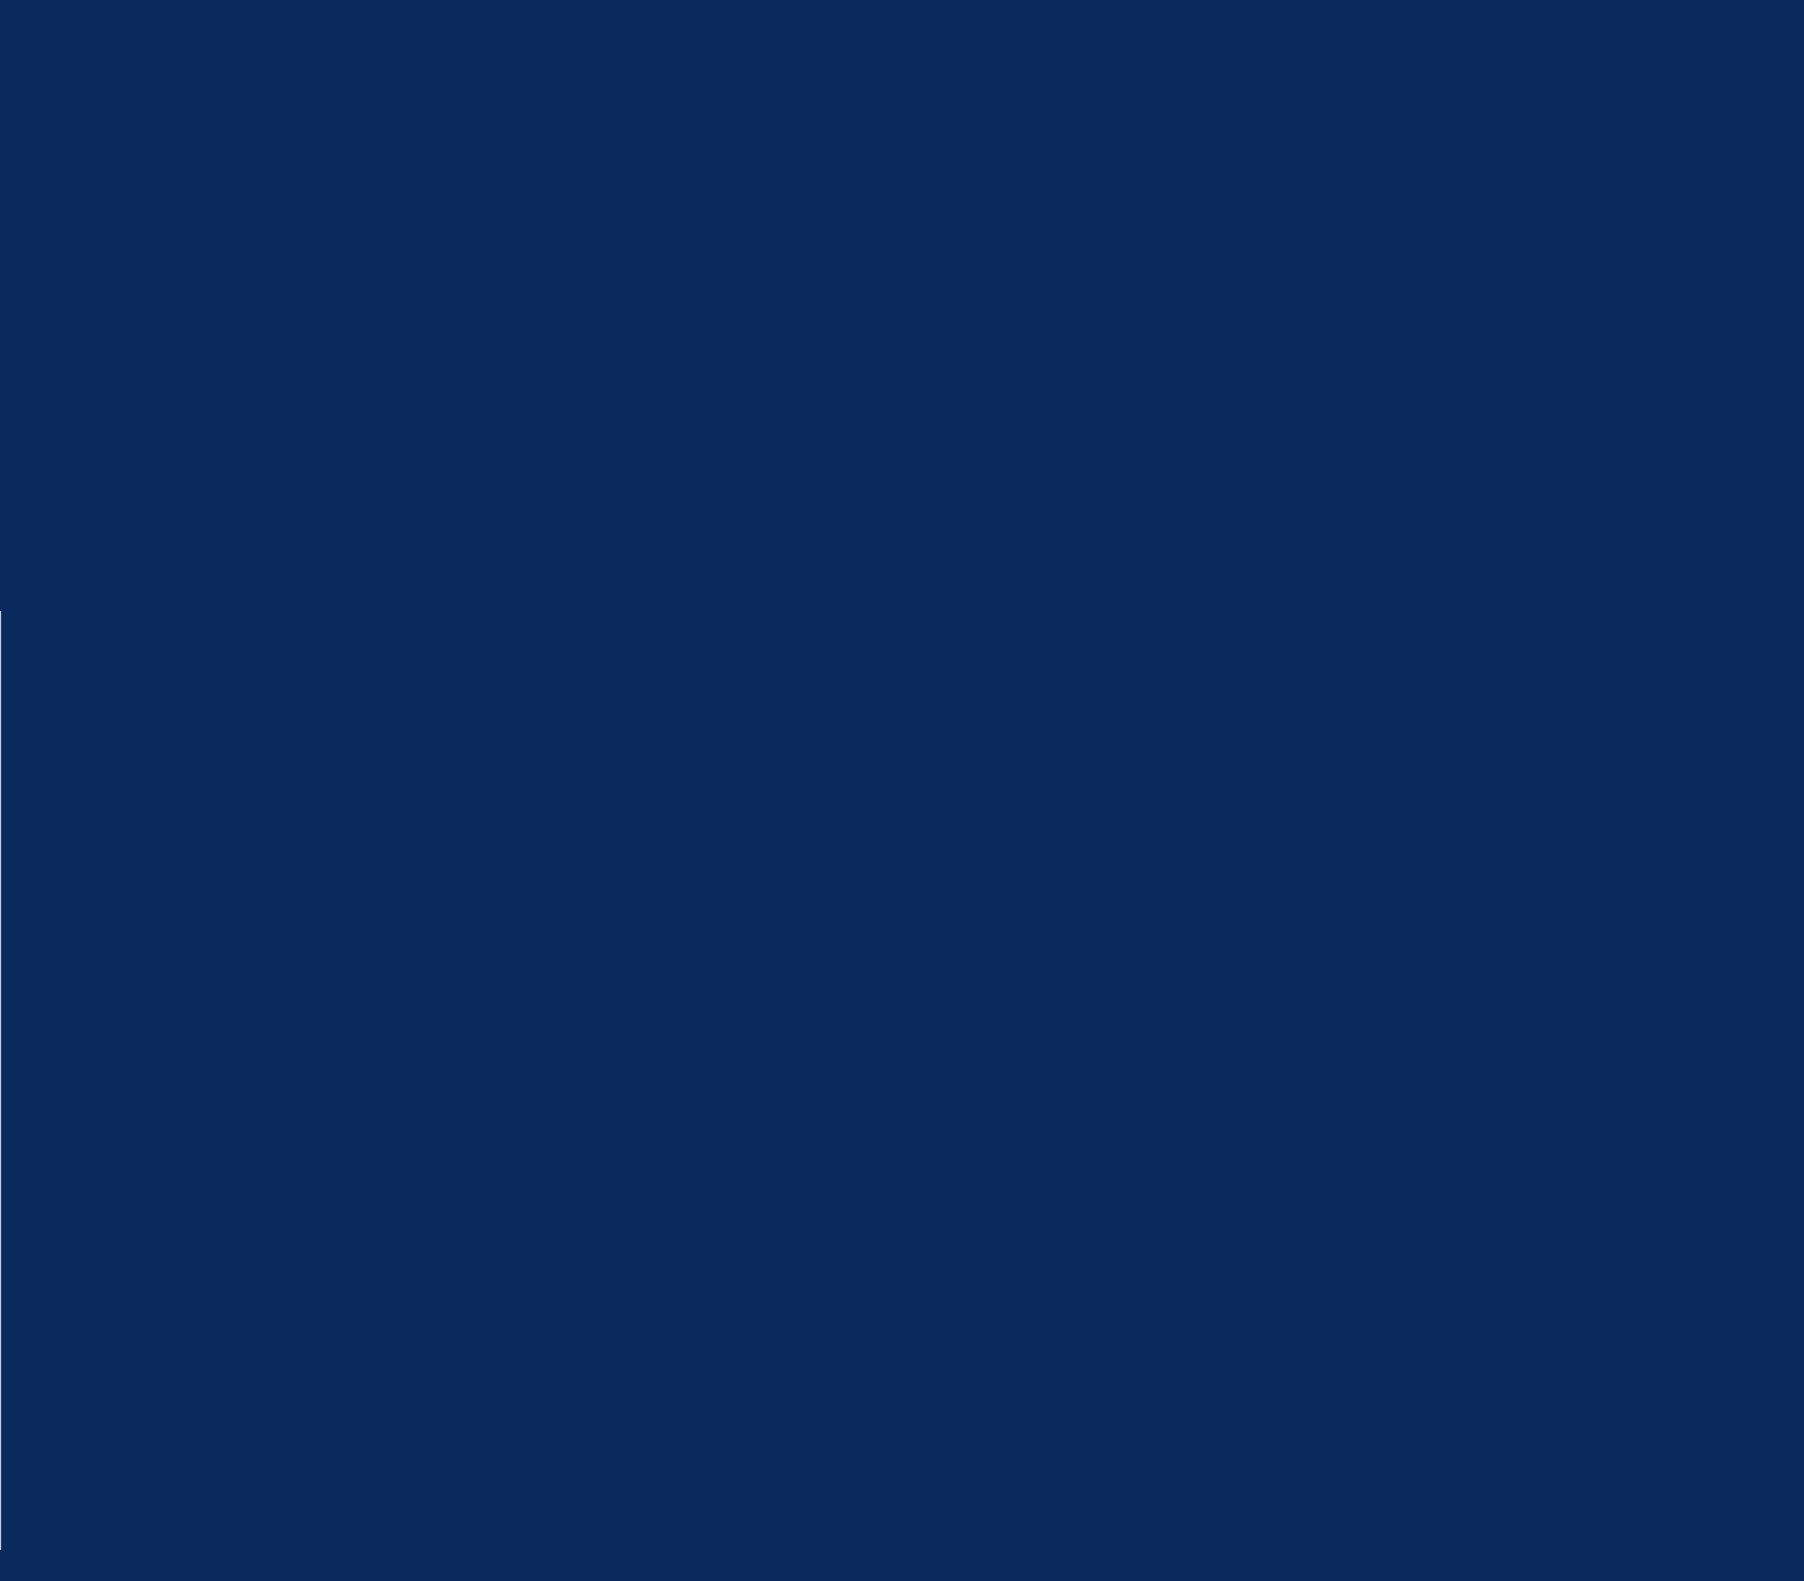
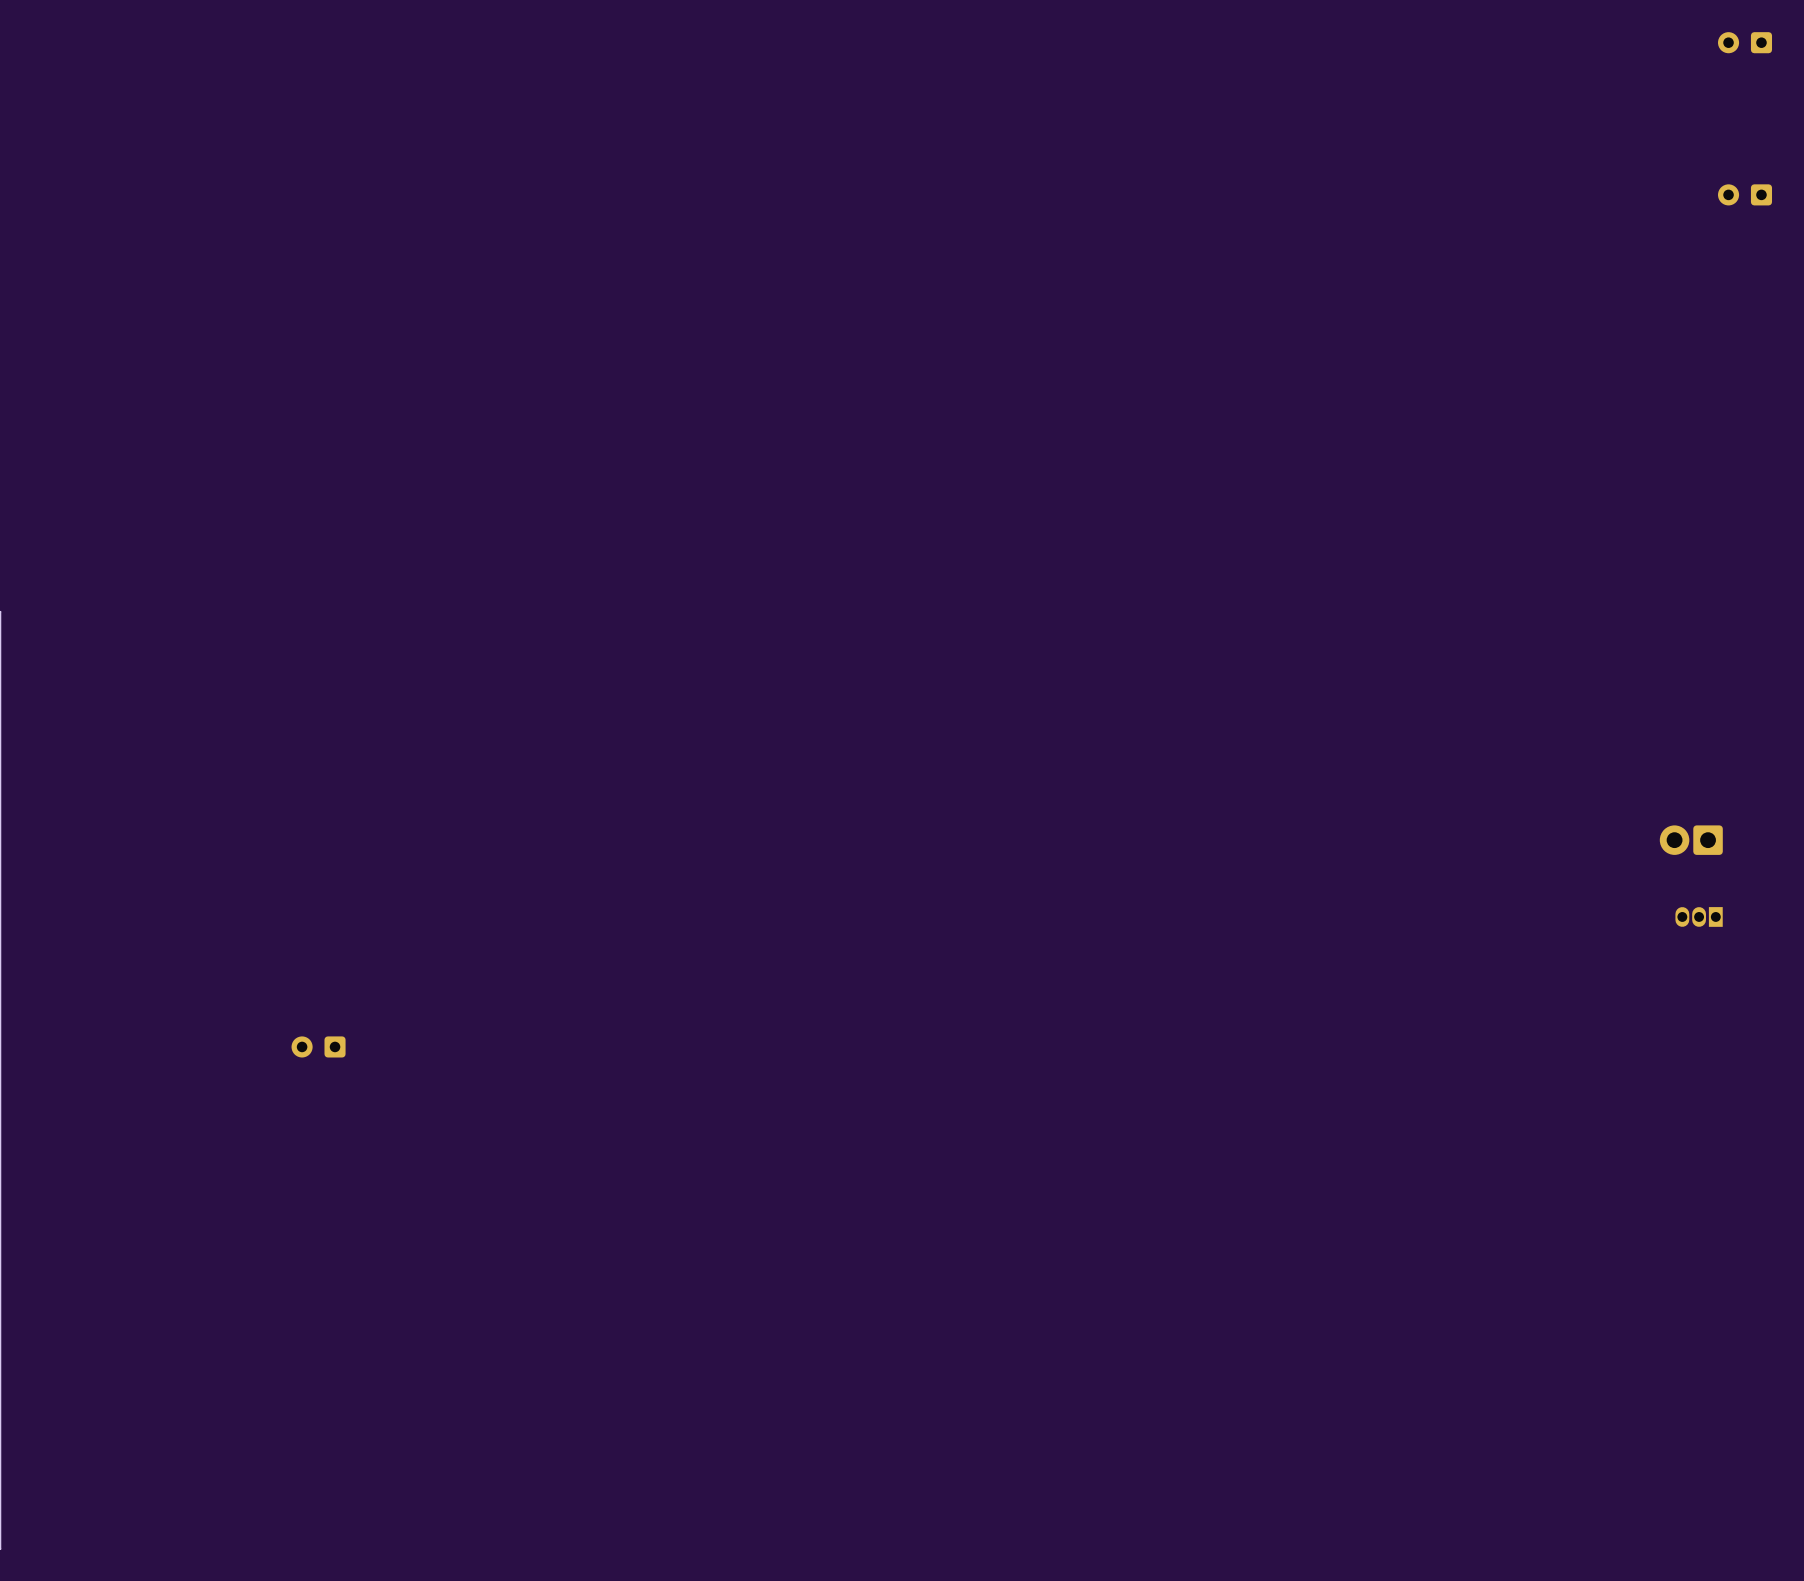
part: none -> (1745, 42)
part: none -> (1745, 194)
part: none -> (1691, 840)
part: none -> (1699, 916)
part: none -> (318, 1046)

